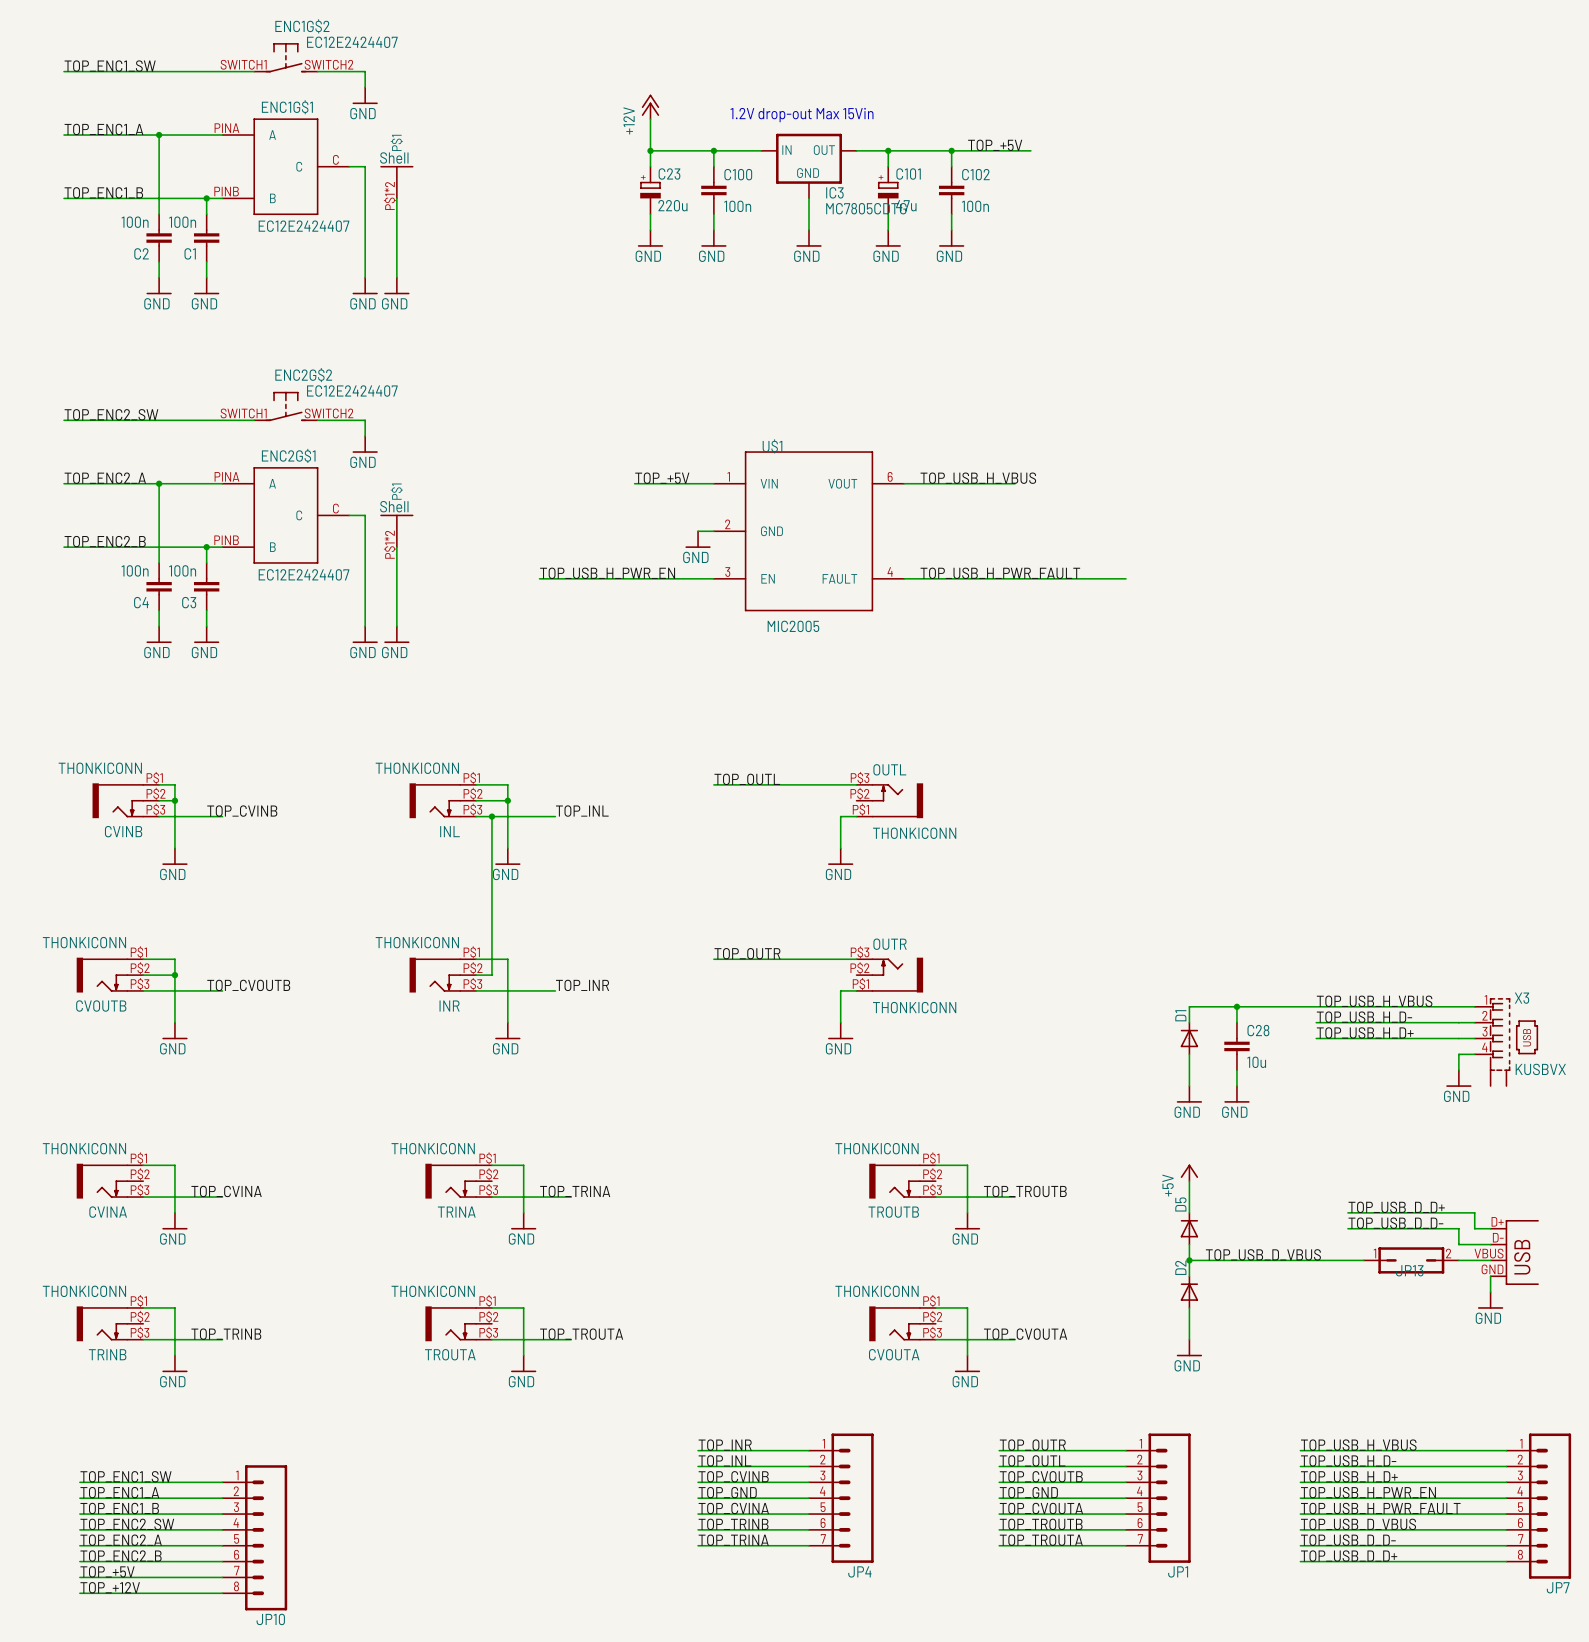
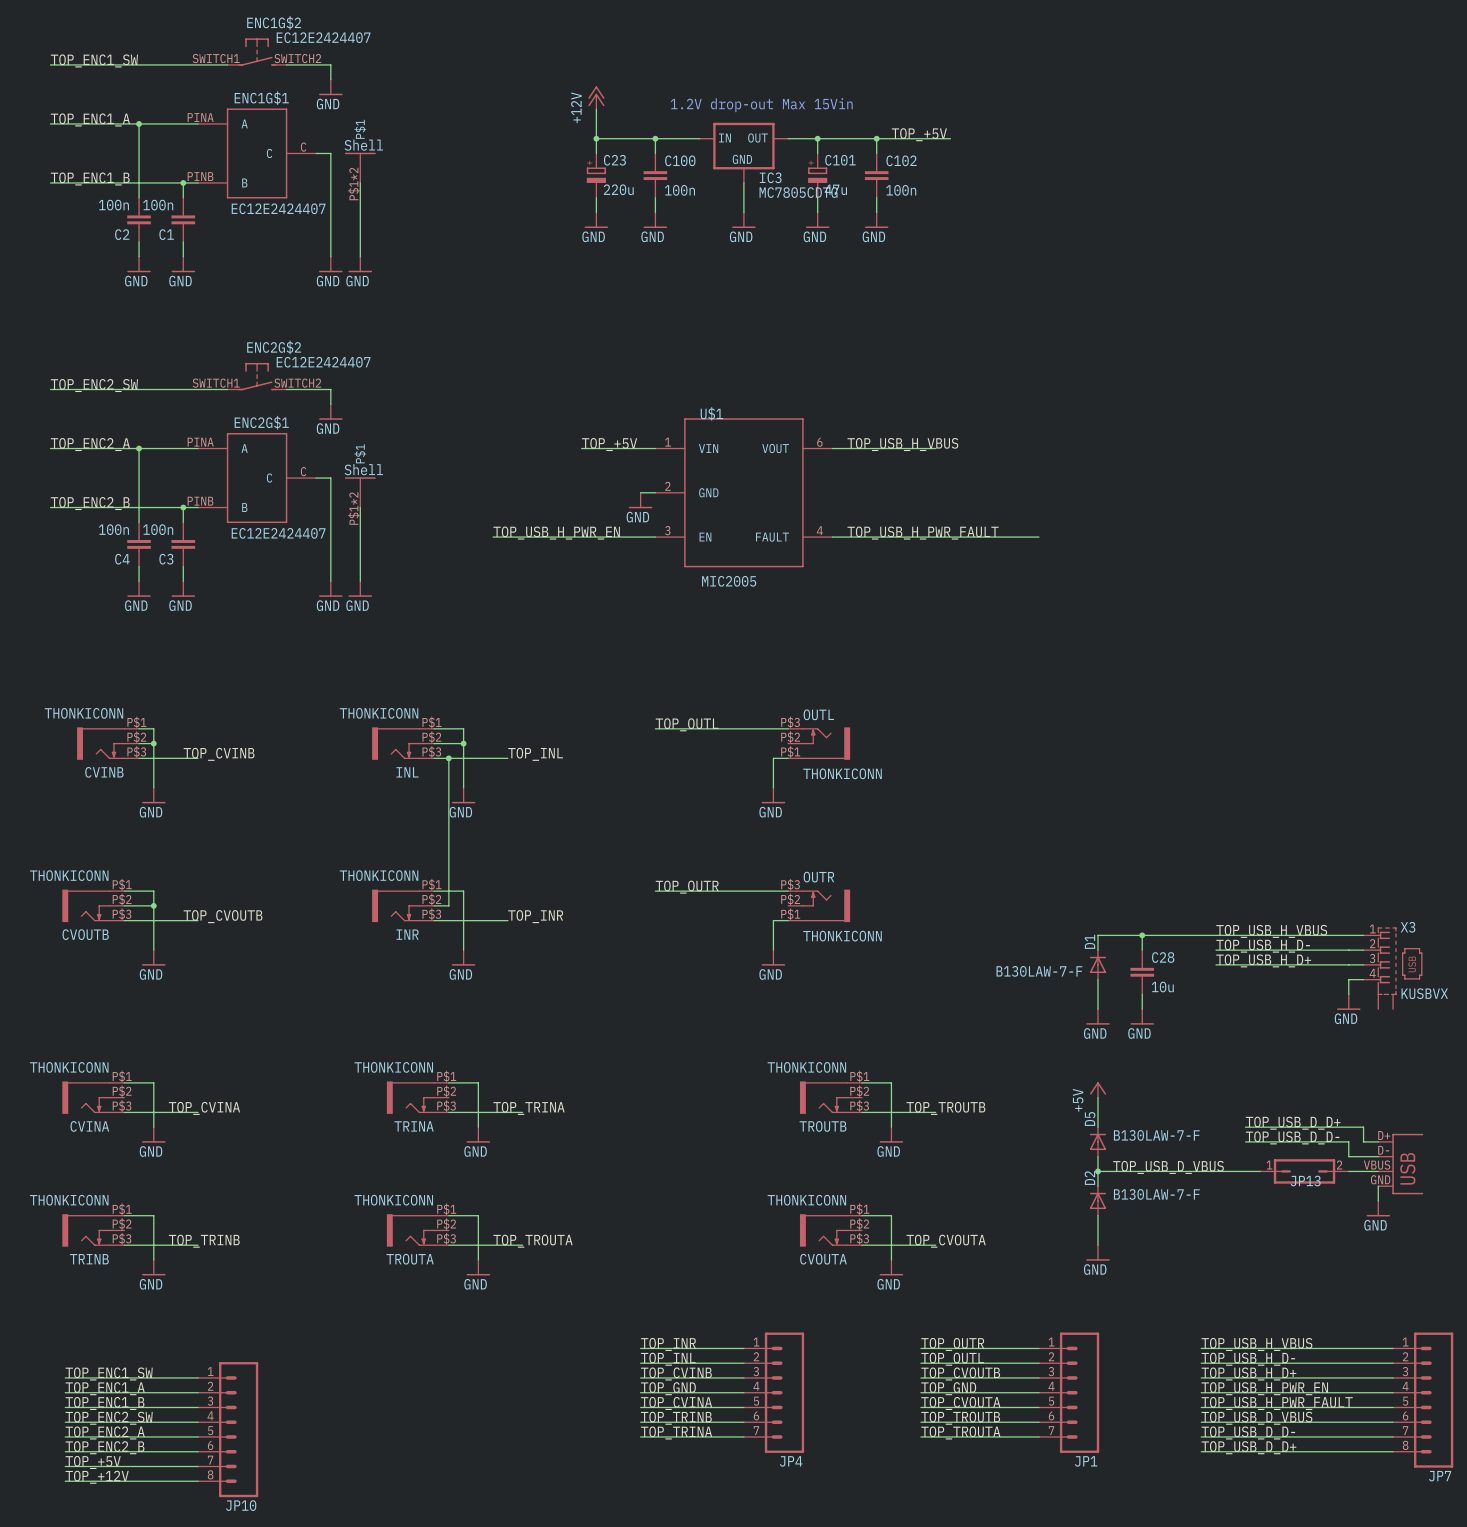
D1 value: none -> B130LAW-7-F (1039, 971)
D5 value: none -> B130LAW-7-F (1156, 1135)
D2 value: none -> B130LAW-7-F (1156, 1194)

